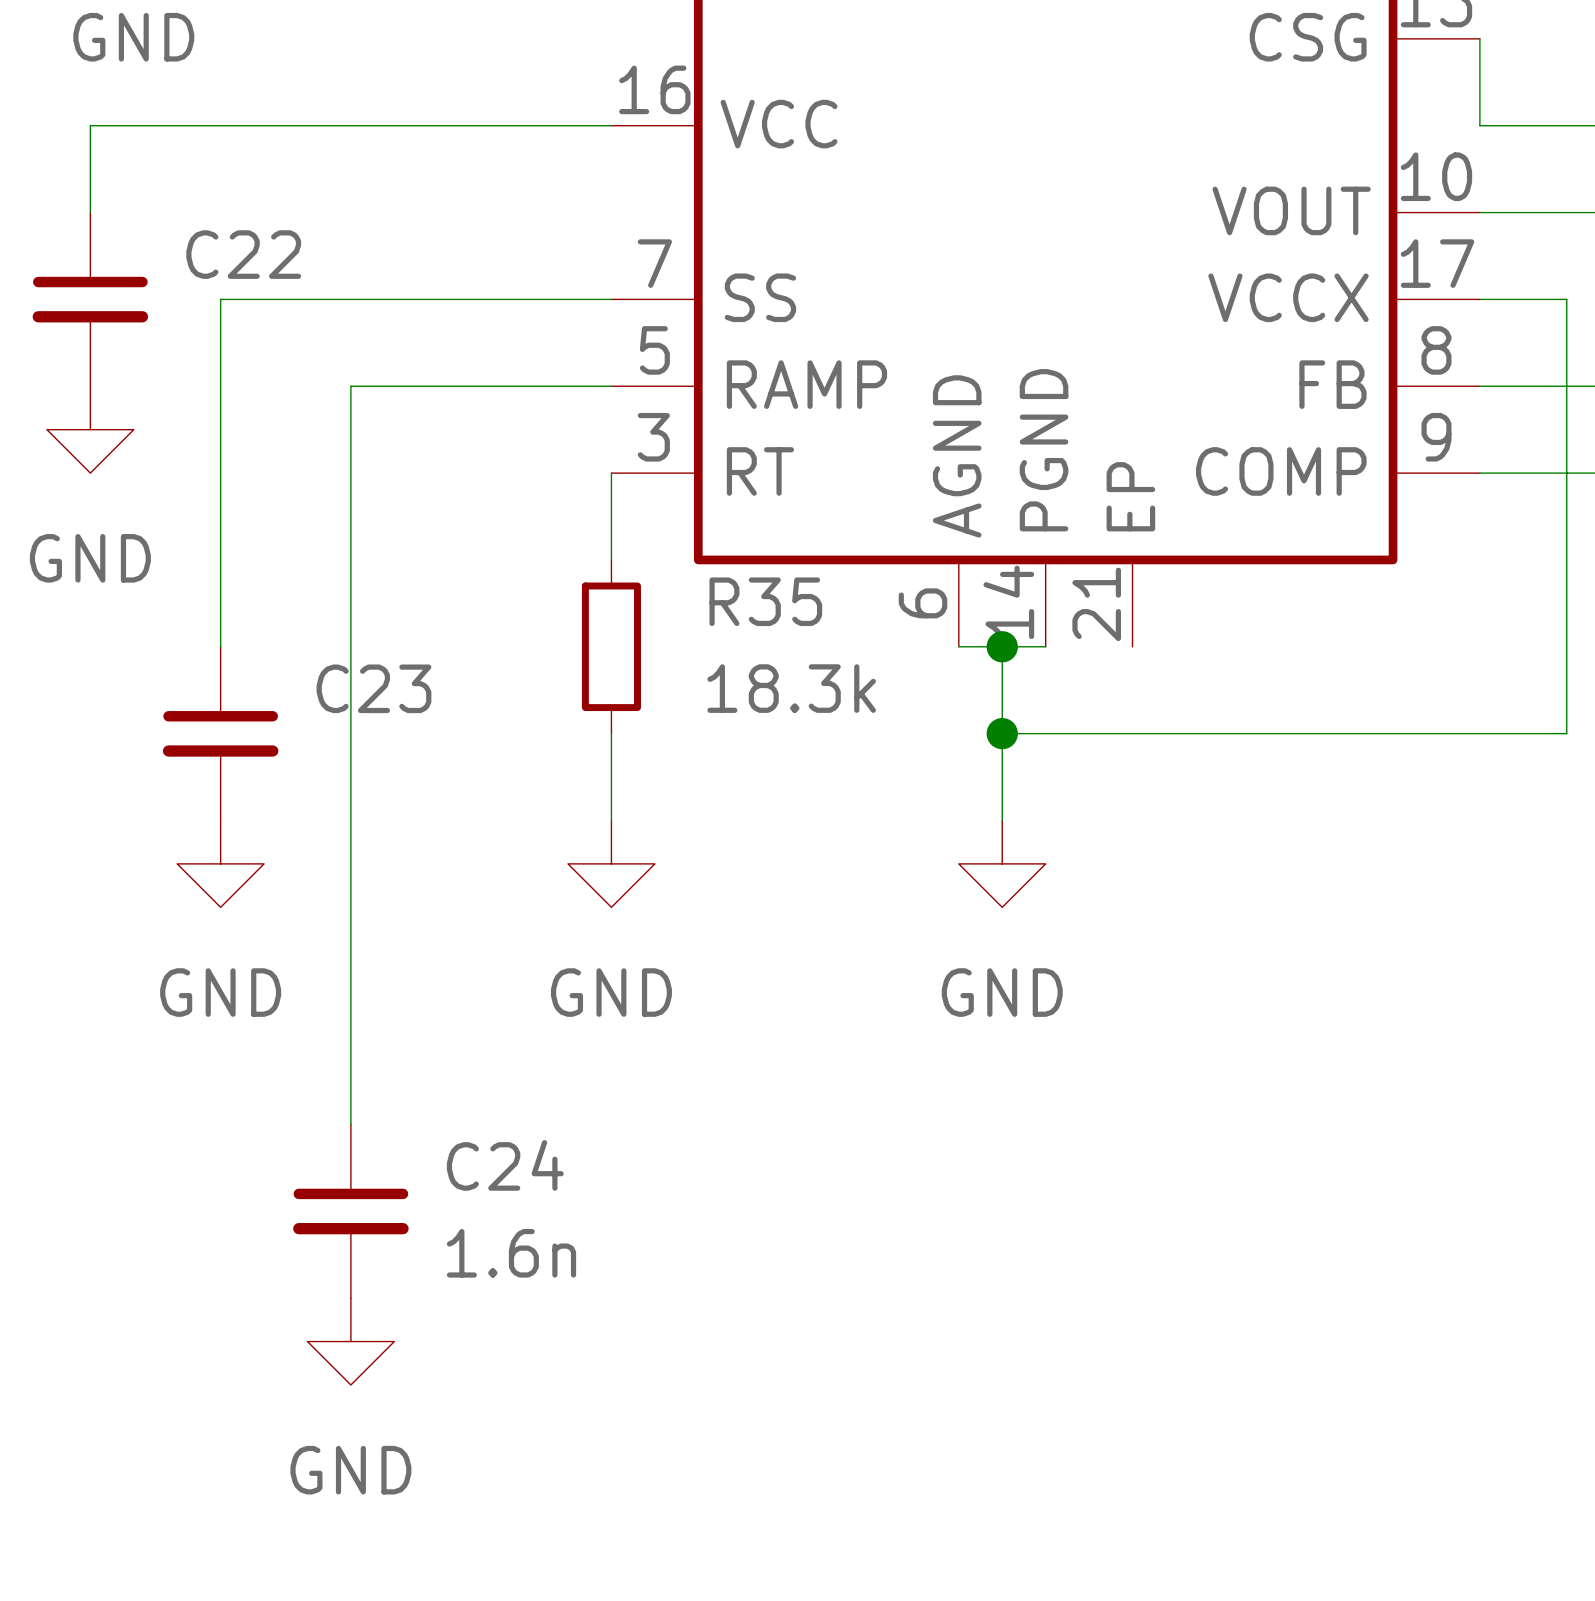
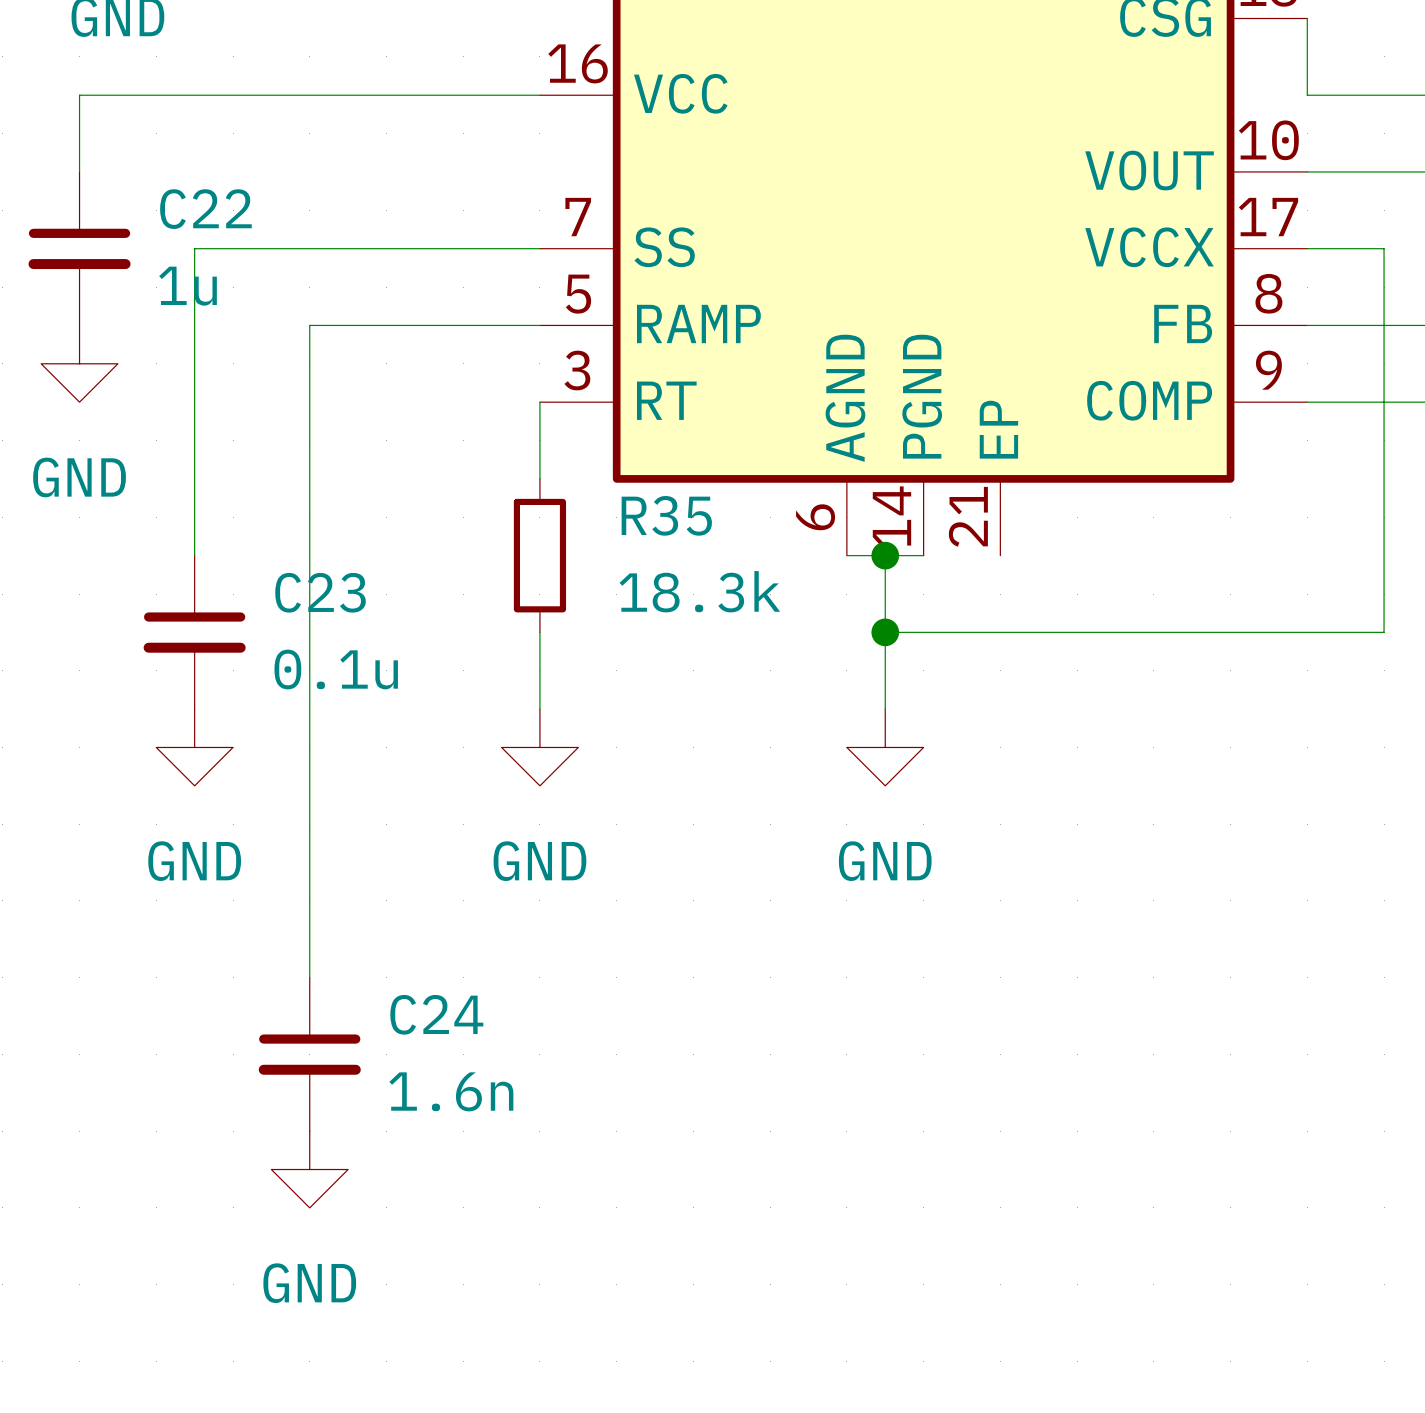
C22 value: none -> 1u (188, 286)
C23 value: none -> 0.1u (336, 669)

